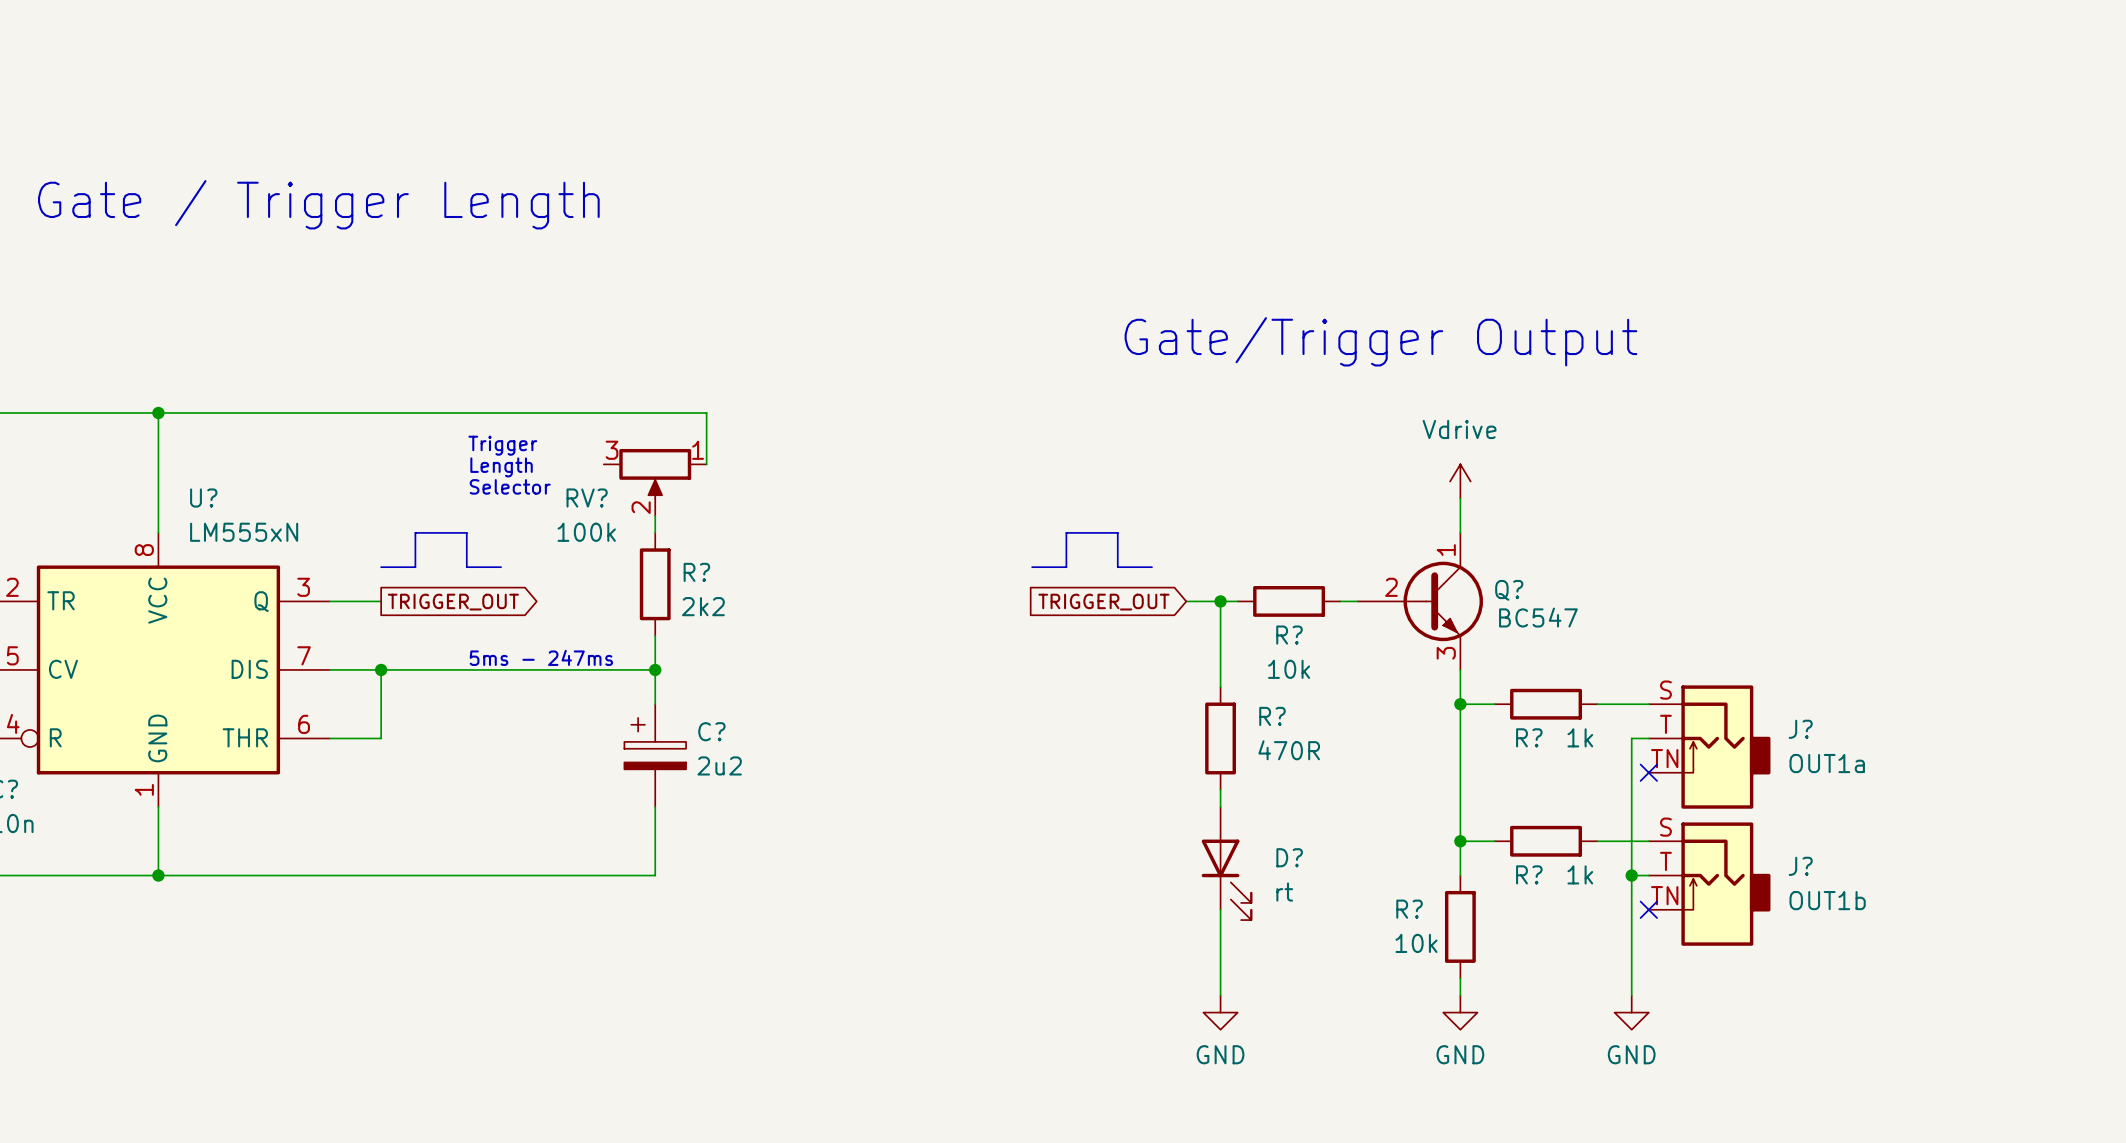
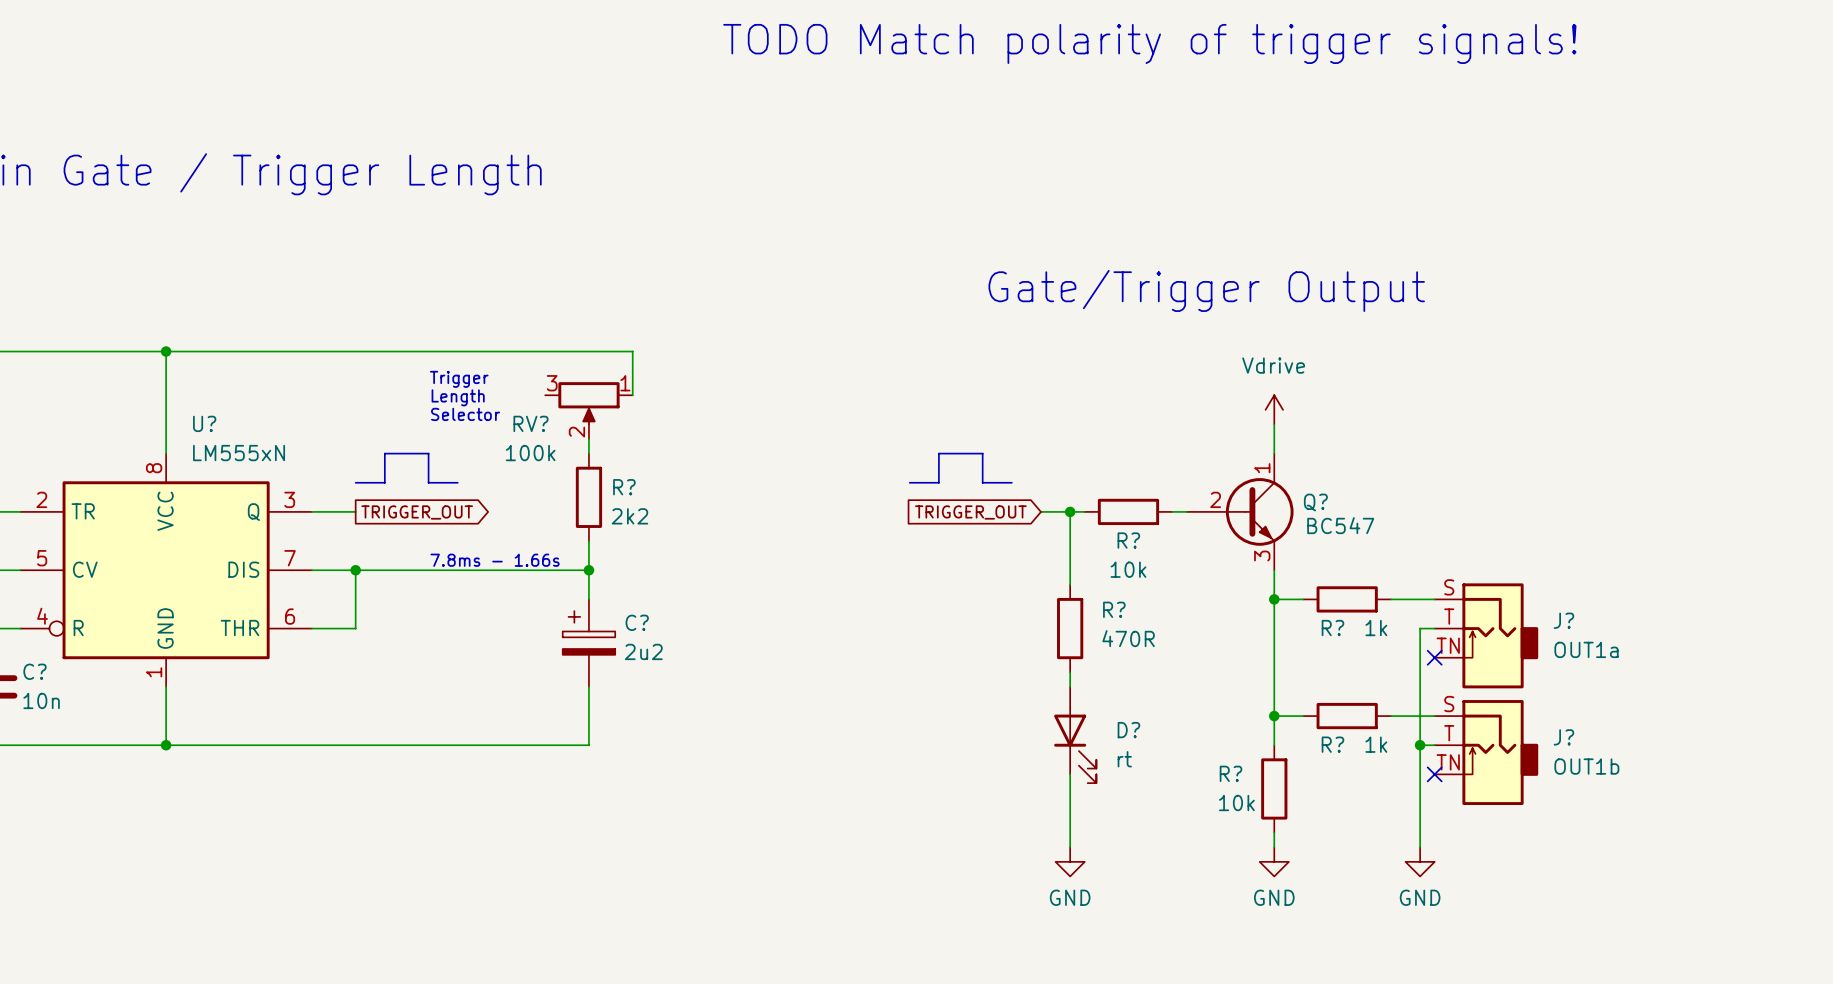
text: none -> TODO Match polarity of trigger signals! (1149, 43)
text: 5ms - 247ms (541, 657) -> 7.8ms - 1.66s (495, 560)

